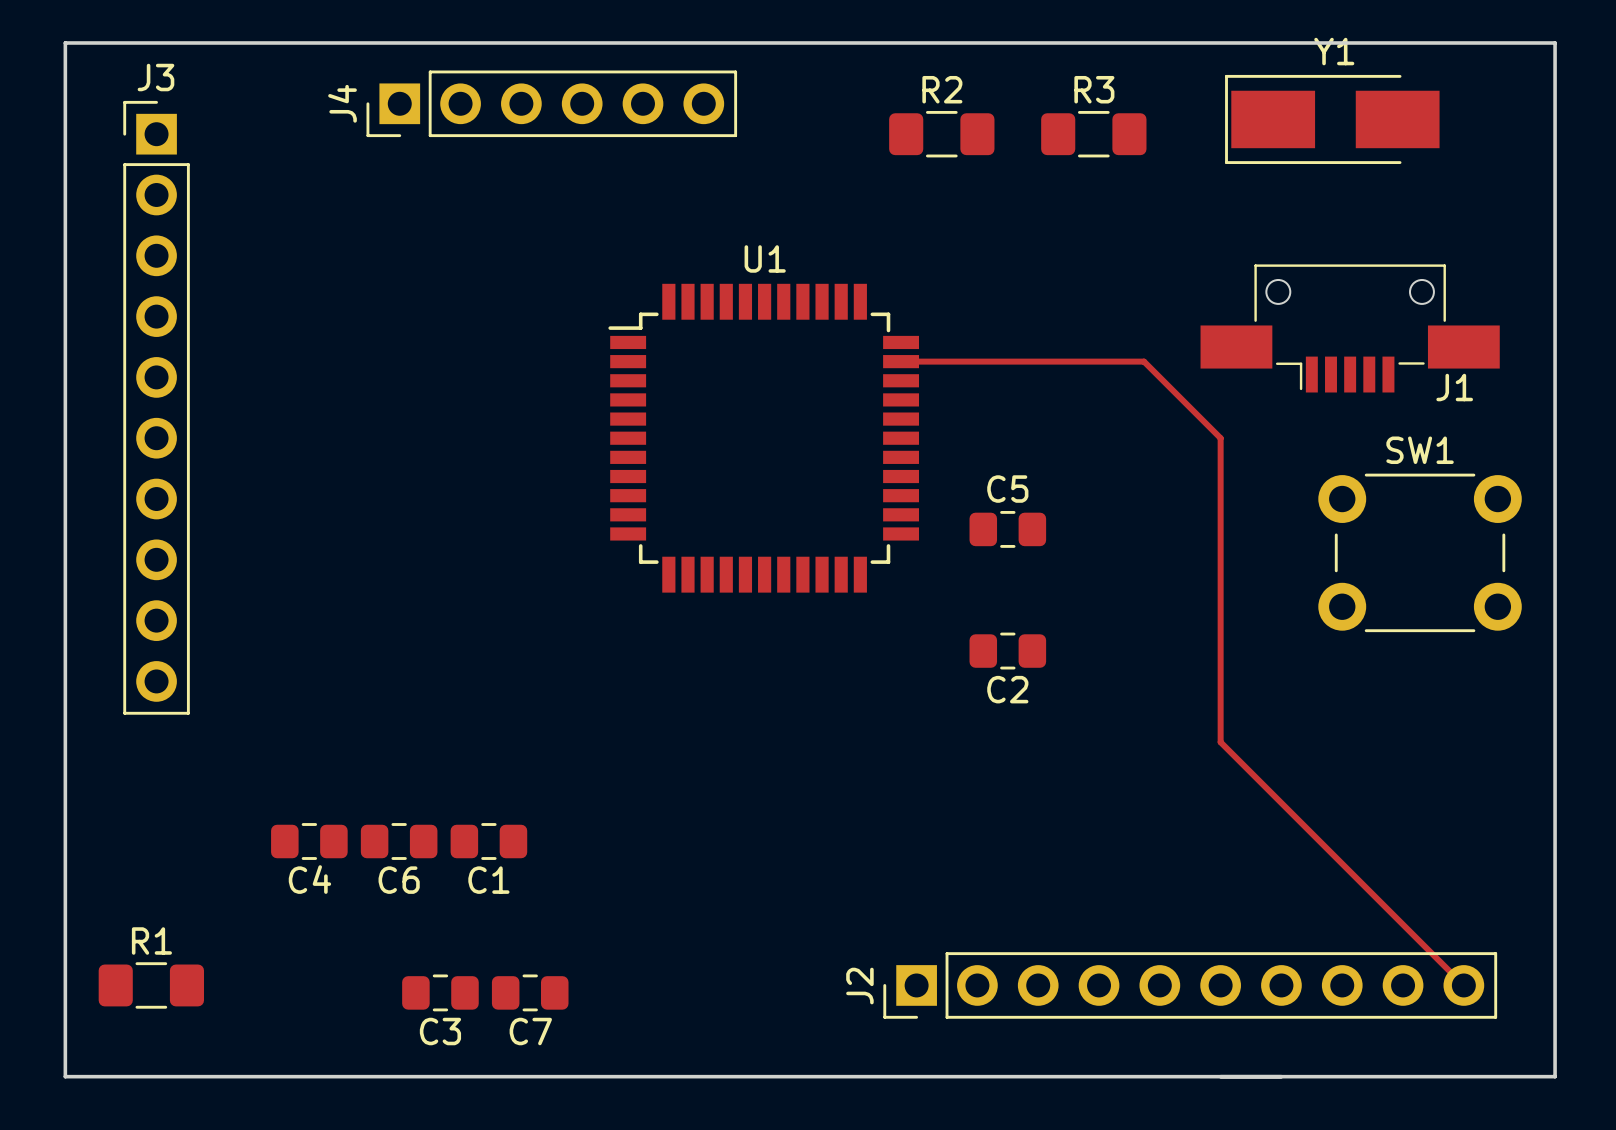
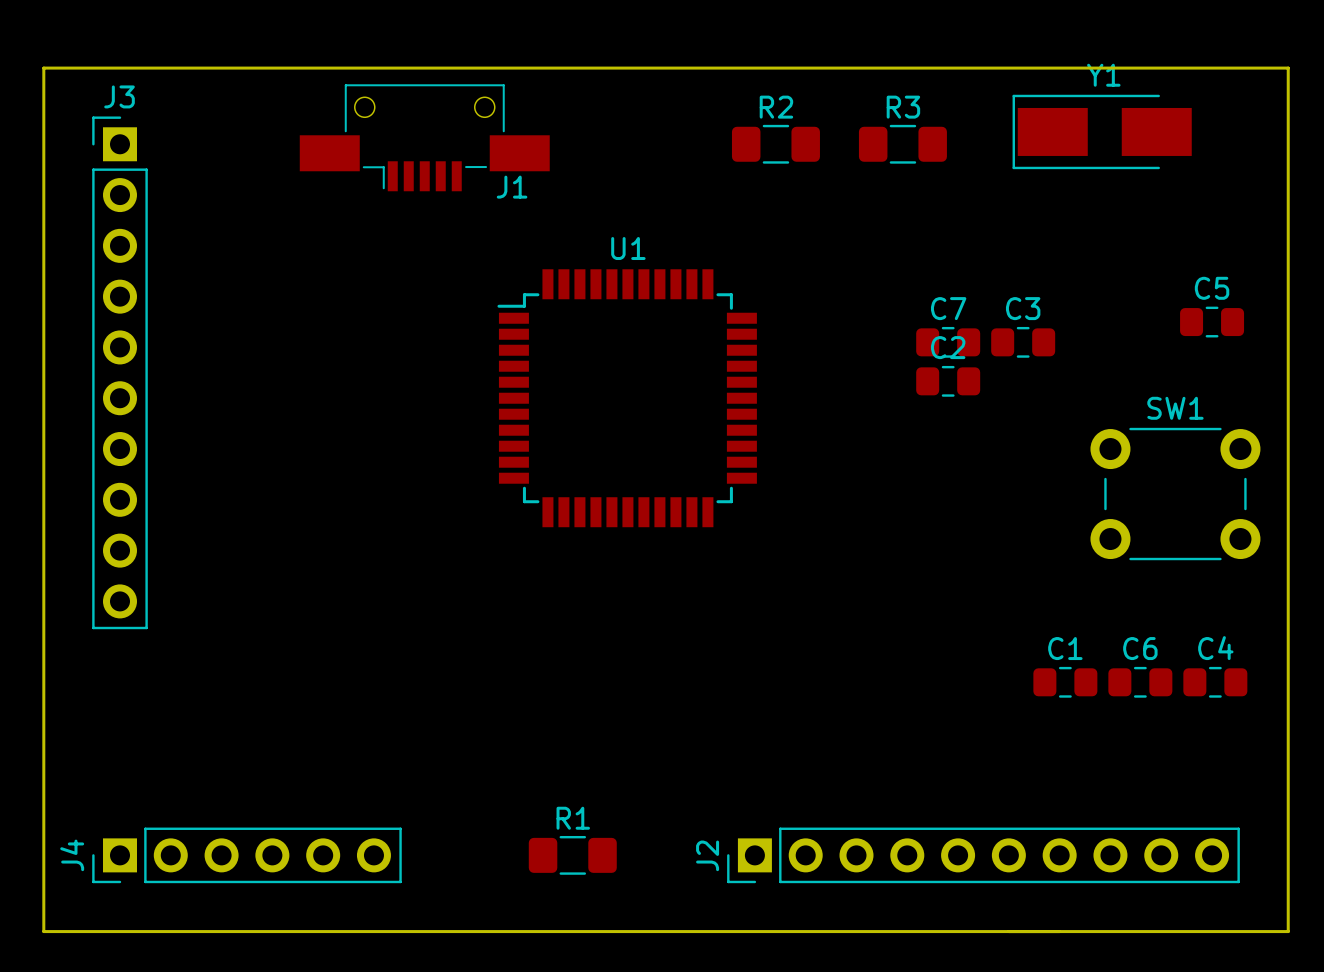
J4 position: (551, 103) -> (246, 855)
J1 position: (1350, 328) -> (424, 137)
track: (901, 361) (1144, 361) (1220, 438) (1220, 742) (1463, 985) -> none
C5 position: (1007, 529) -> (1212, 322)
C2 position: (1007, 651) -> (948, 381)
C2 name position: C2 (1007, 689) -> C2 (948, 347)
C4 position: (309, 841) -> (1215, 682)
C6 position: (399, 841) -> (1140, 682)
C1 position: (488, 841) -> (1065, 682)
C4 name position: C4 (309, 879) -> C4 (1215, 648)
C6 name position: C6 (399, 880) -> C6 (1140, 648)
C1 name position: C1 (488, 880) -> C1 (1065, 648)
R1 position: (151, 985) -> (572, 855)
C3 position: (440, 992) -> (1023, 342)
C7 position: (530, 992) -> (948, 342)
C3 name position: C3 (440, 1031) -> C3 (1023, 308)
C7 name position: C7 (530, 1031) -> C7 (948, 308)

